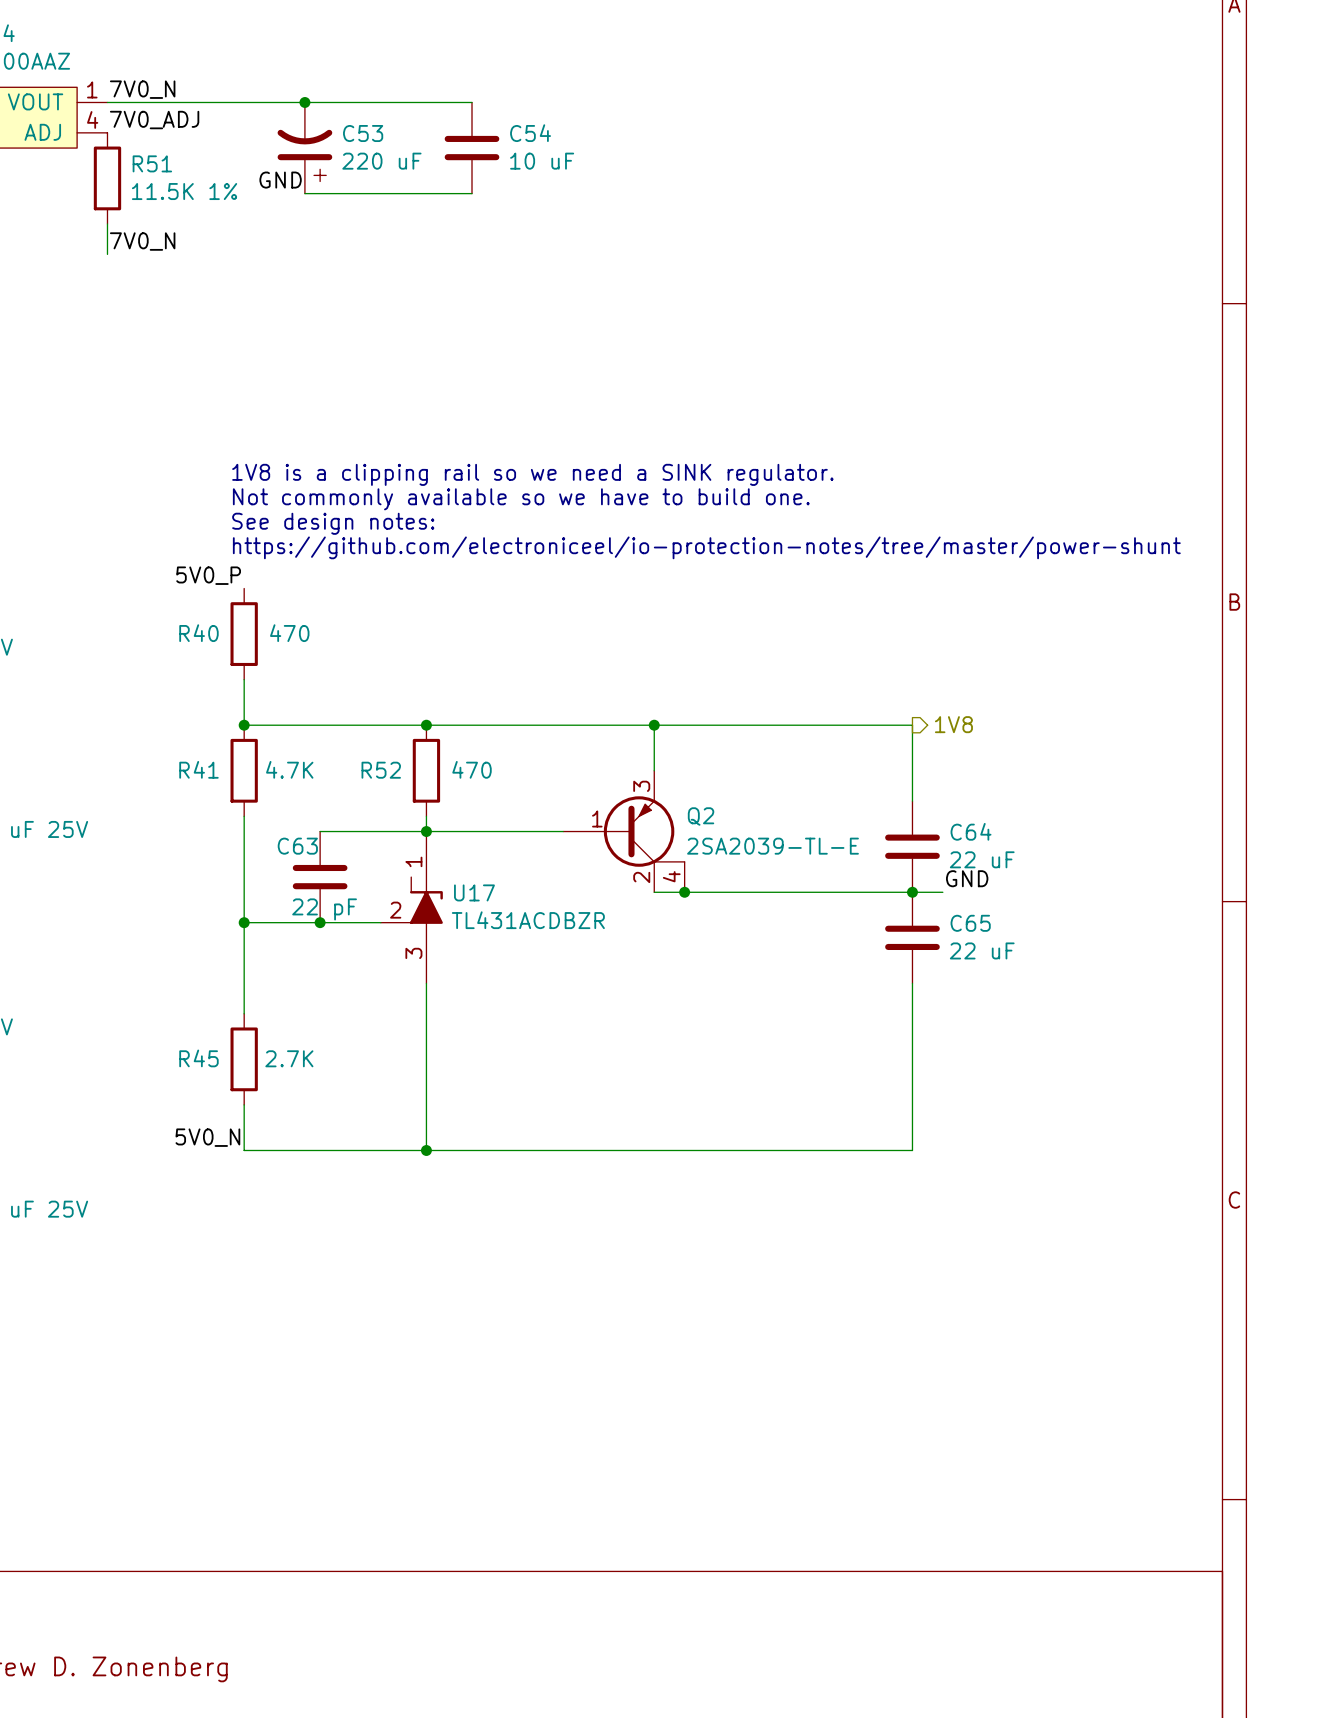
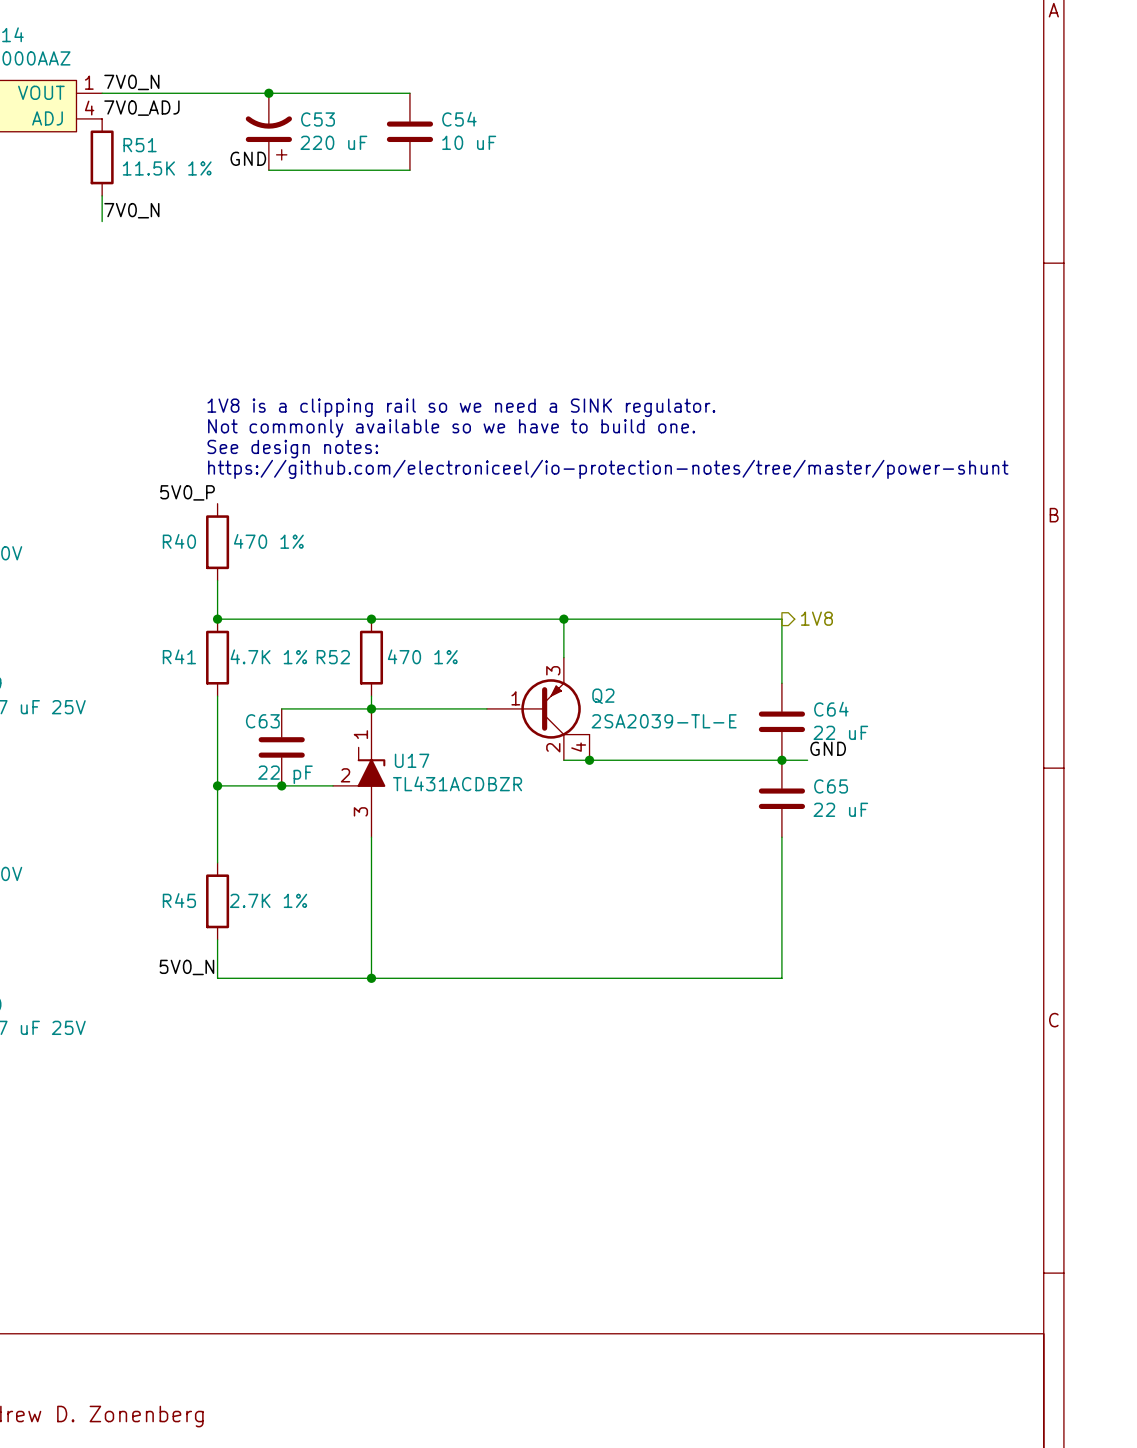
R40 value: 470 (289, 633) -> 470 1% (268, 541)
R41 value: 4.7K (289, 769) -> 4.7K 1% (268, 656)
R52 value: 470 (472, 769) -> 470 1% (422, 656)
R45 value: 2.7K (289, 1058) -> 2.7K 1% (268, 900)

